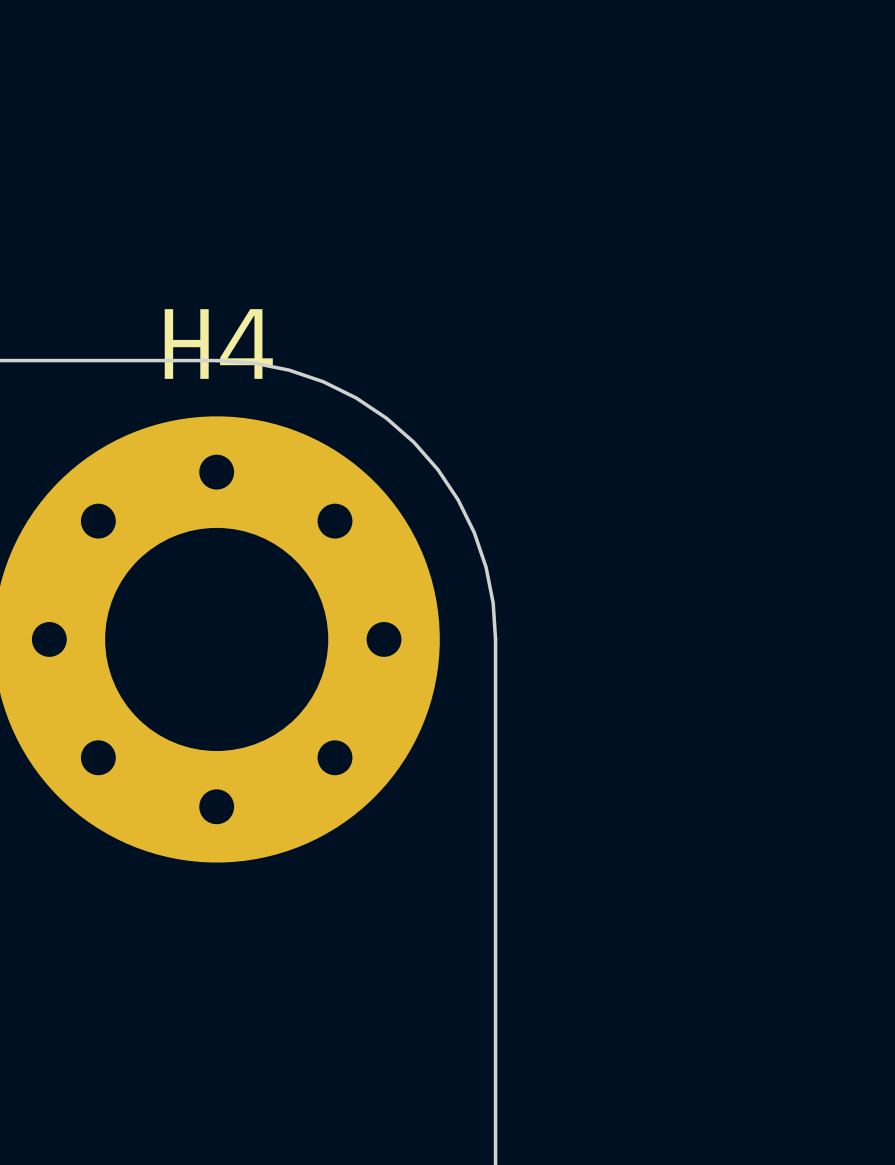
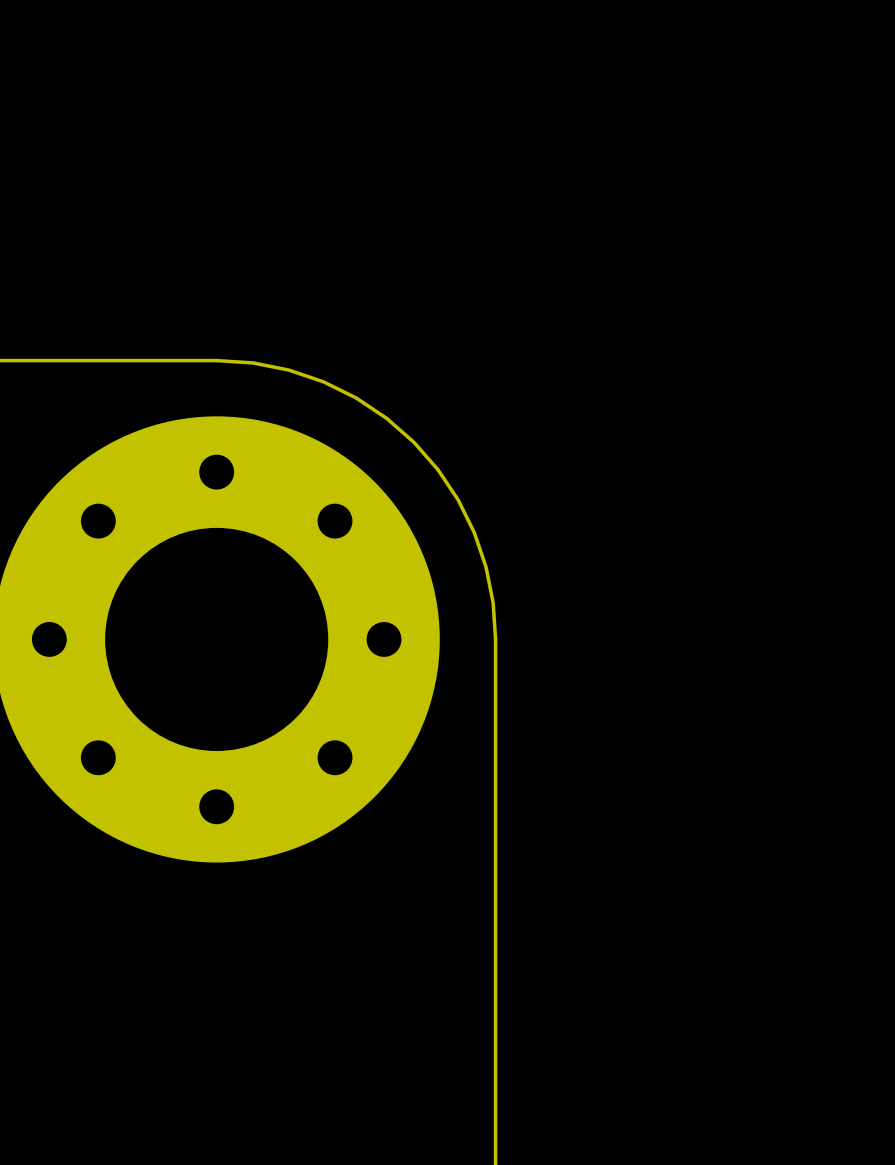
H4 name: H4 (218, 344) -> none

